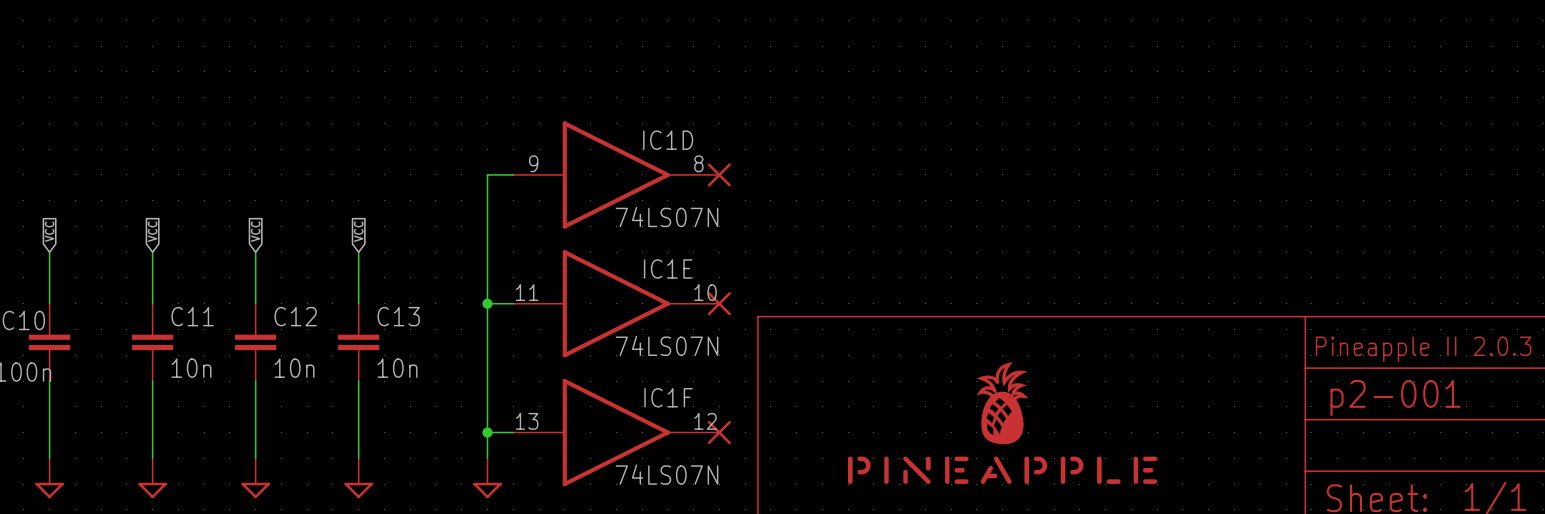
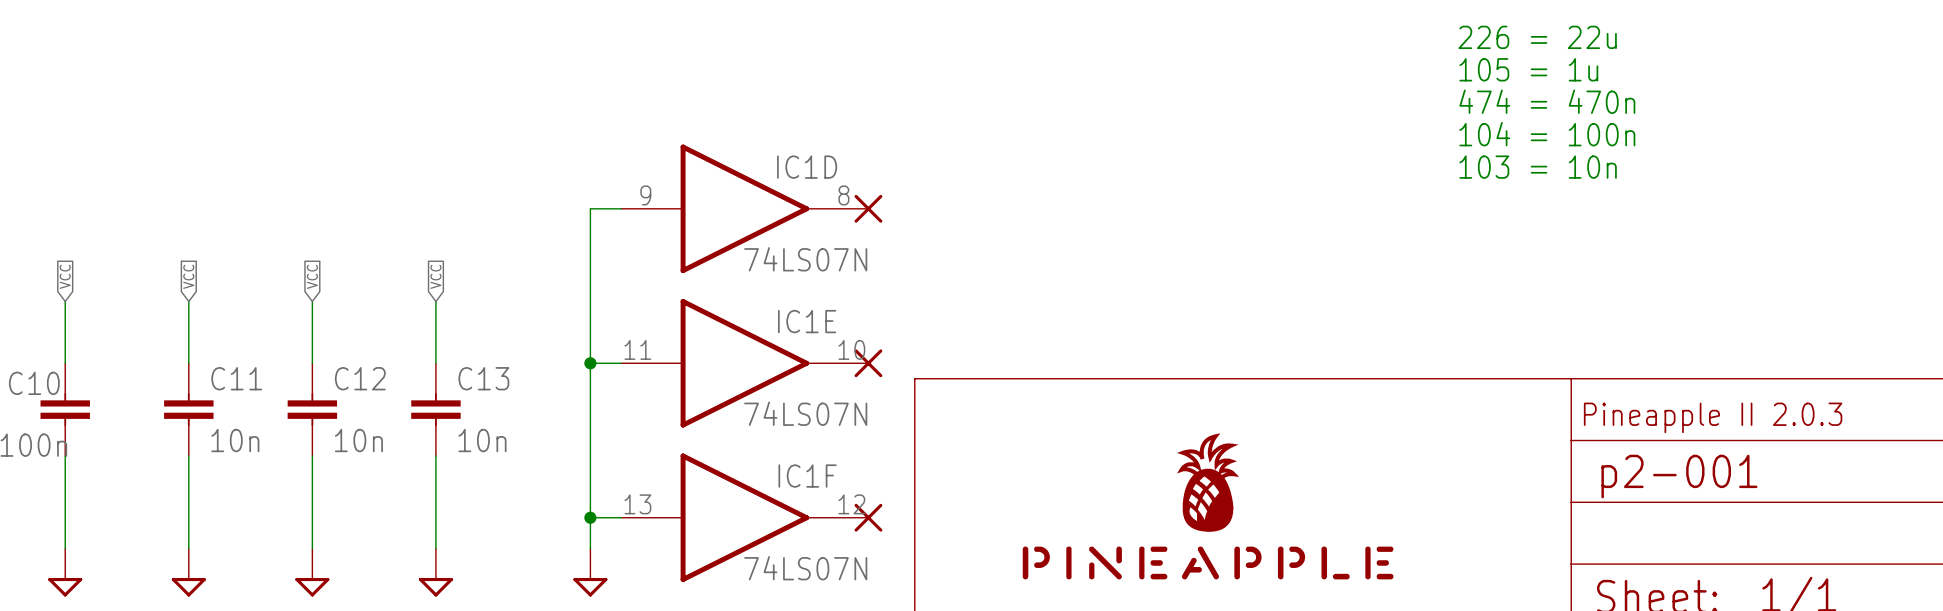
text: none -> 226 = 22u (1537, 37)
text: none -> 105 = 1u (1528, 69)
text: none -> 474 = 470n (1547, 101)
text: none -> 104 = 100n (1547, 134)
text: none -> 103 = 10n (1538, 167)

